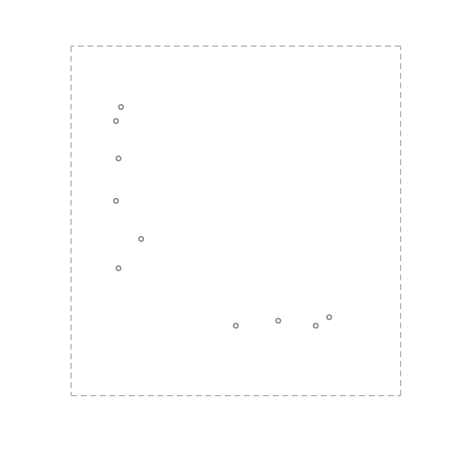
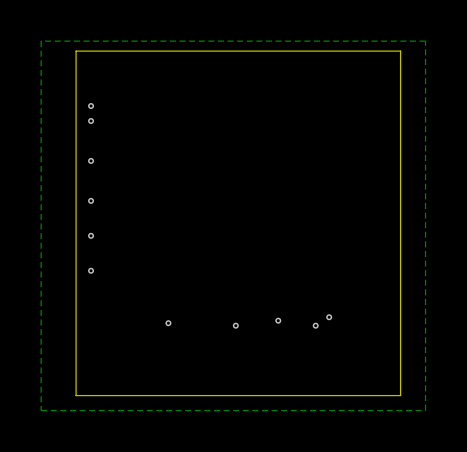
zone outline: (400, 46) (71, 46) (71, 395) (400, 395) (400, 46) -> (425, 41) (425, 410) (41, 410) (41, 41) (425, 41)
board edge: none -> (400, 51) (76, 51) (76, 395) (400, 395) (400, 51)
via: none -> (91, 106)
via: (121, 107) -> none
via: none -> (91, 121)
via: (116, 121) -> none
via: (118, 158) -> none
via: none -> (91, 160)
via: none -> (91, 200)
via: (116, 200) -> none
via: none -> (91, 235)
via: (141, 238) -> none
via: (118, 268) -> none
via: none -> (91, 270)
via: none -> (168, 323)

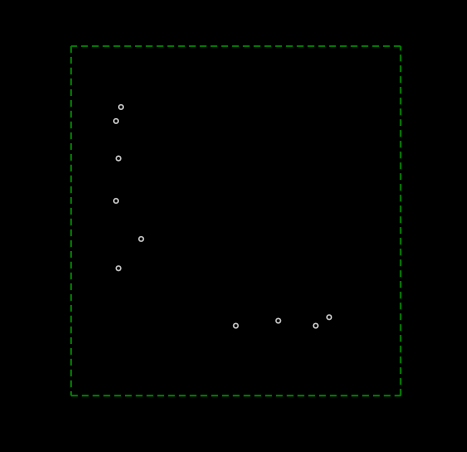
zone outline: (425, 41) (41, 41) (41, 410) (425, 410) (425, 41) -> (400, 46) (400, 395) (71, 395) (71, 46) (400, 46)
board edge: (400, 51) (76, 51) (76, 395) (400, 395) (400, 51) -> none
via: (91, 106) -> none
via: none -> (121, 107)
via: (91, 121) -> none
via: none -> (116, 121)
via: none -> (118, 158)
via: (91, 160) -> none
via: (91, 200) -> none
via: none -> (116, 200)
via: (91, 235) -> none
via: none -> (141, 238)
via: none -> (118, 268)
via: (91, 270) -> none
via: (168, 323) -> none

